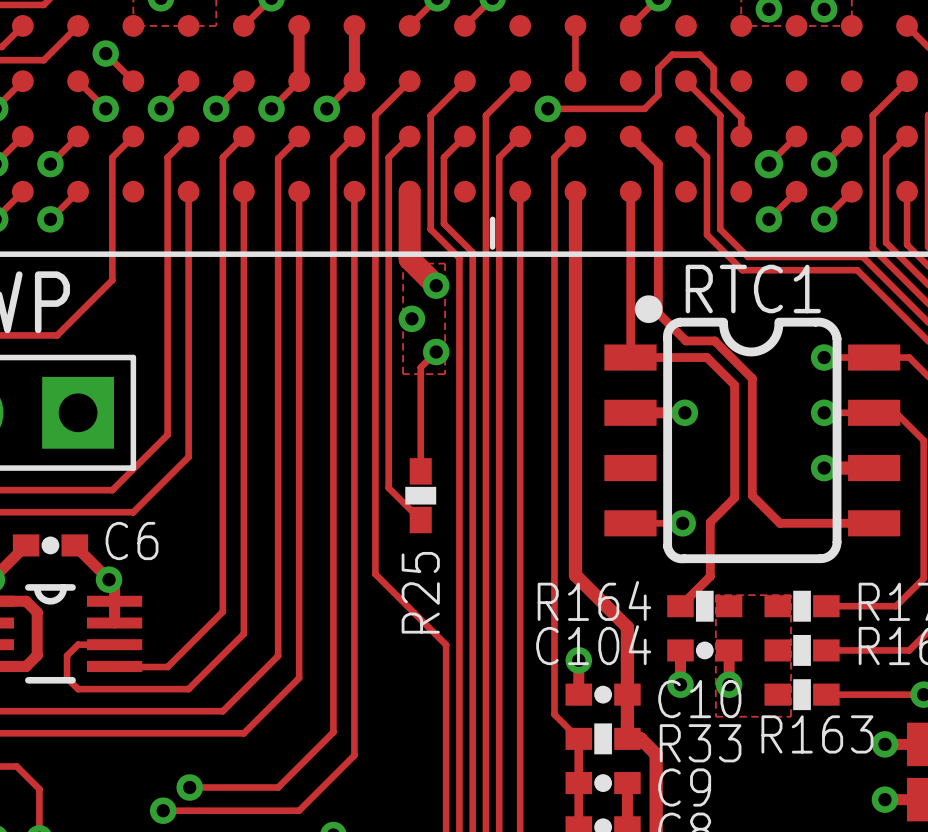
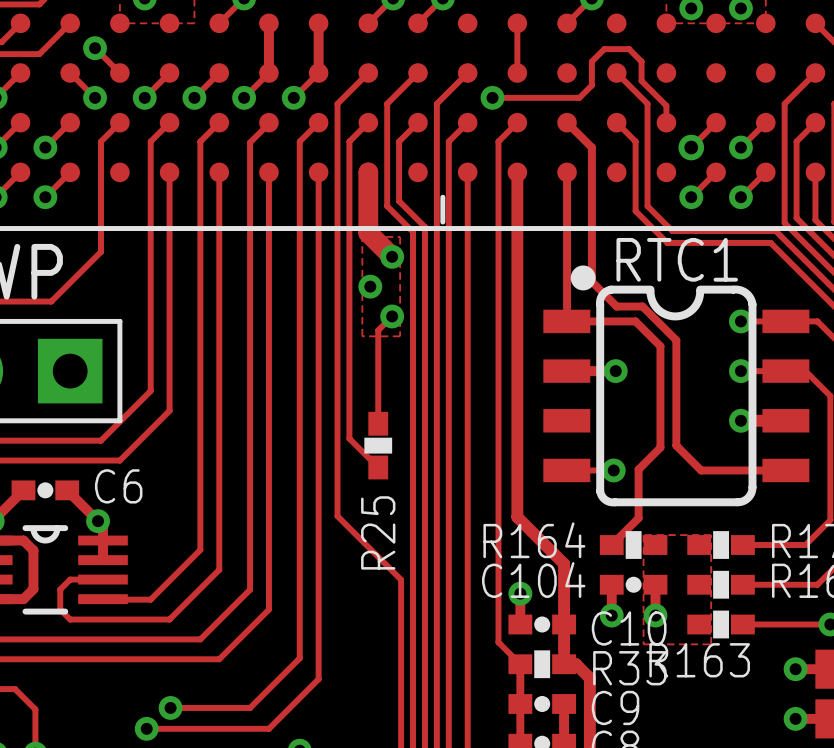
R163 name position: R163 (817, 734) -> R163 (699, 660)

